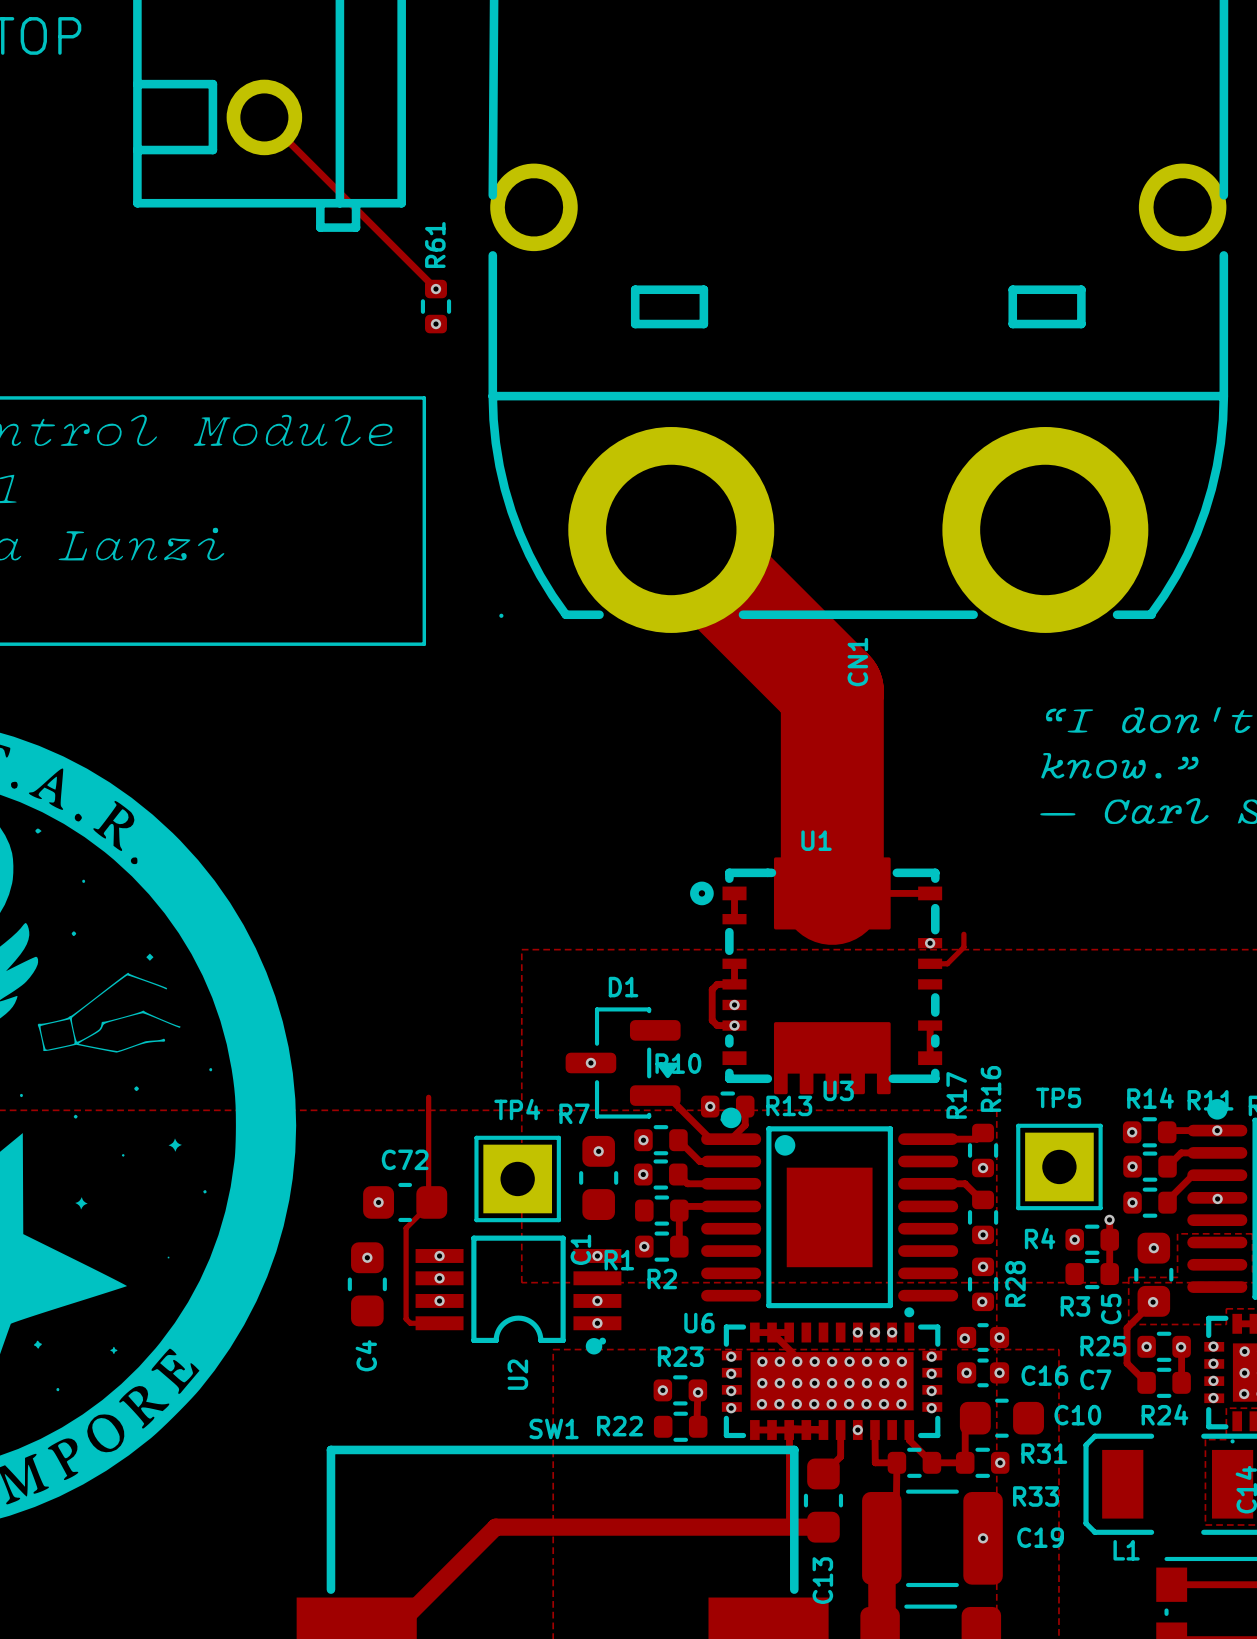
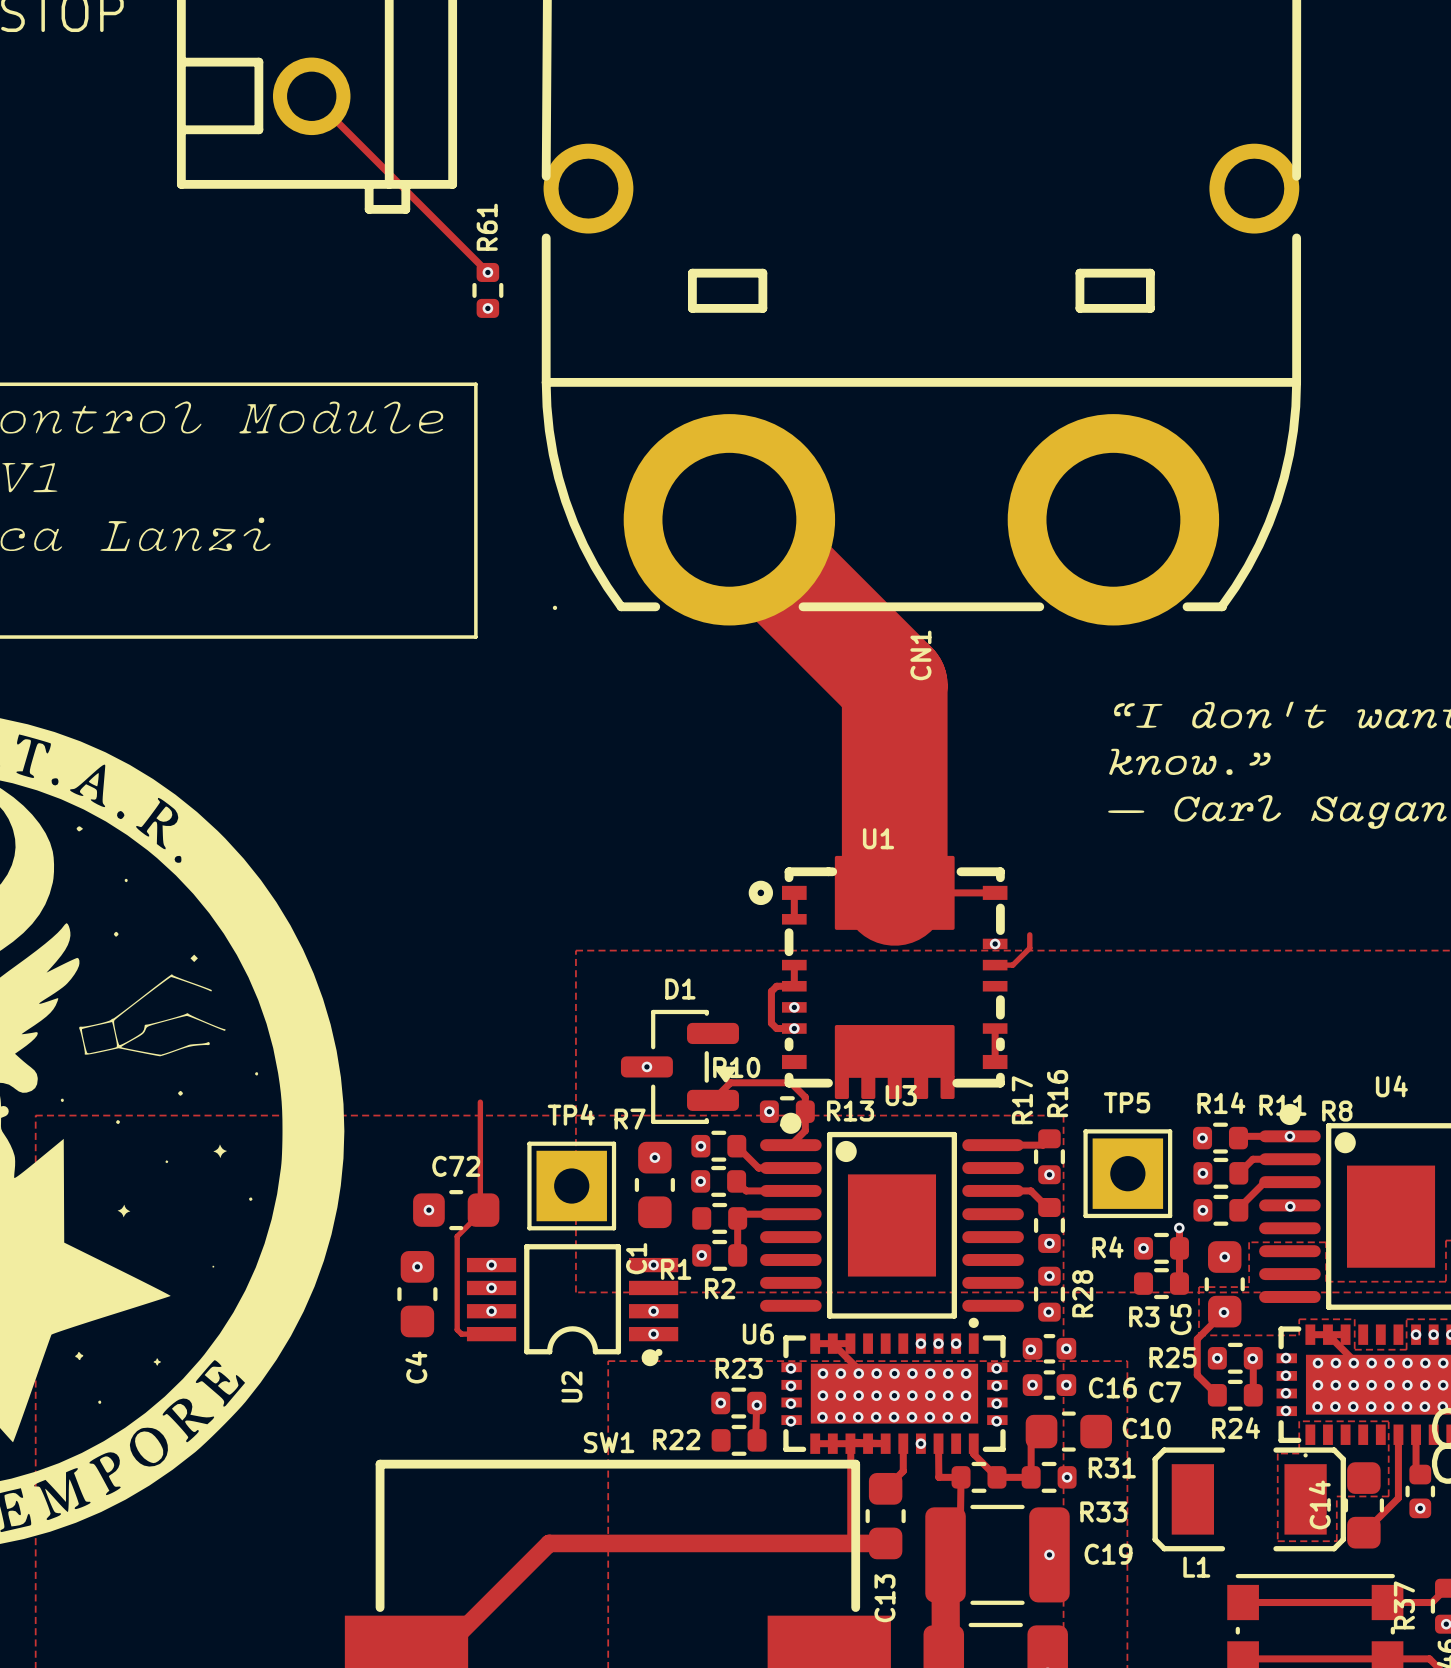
track: (655, 1095) (667, 1095) (710, 1139) (731, 1139) -> (712, 1100) (730, 1082) (790, 1082) (805, 1097) (805, 1111)

